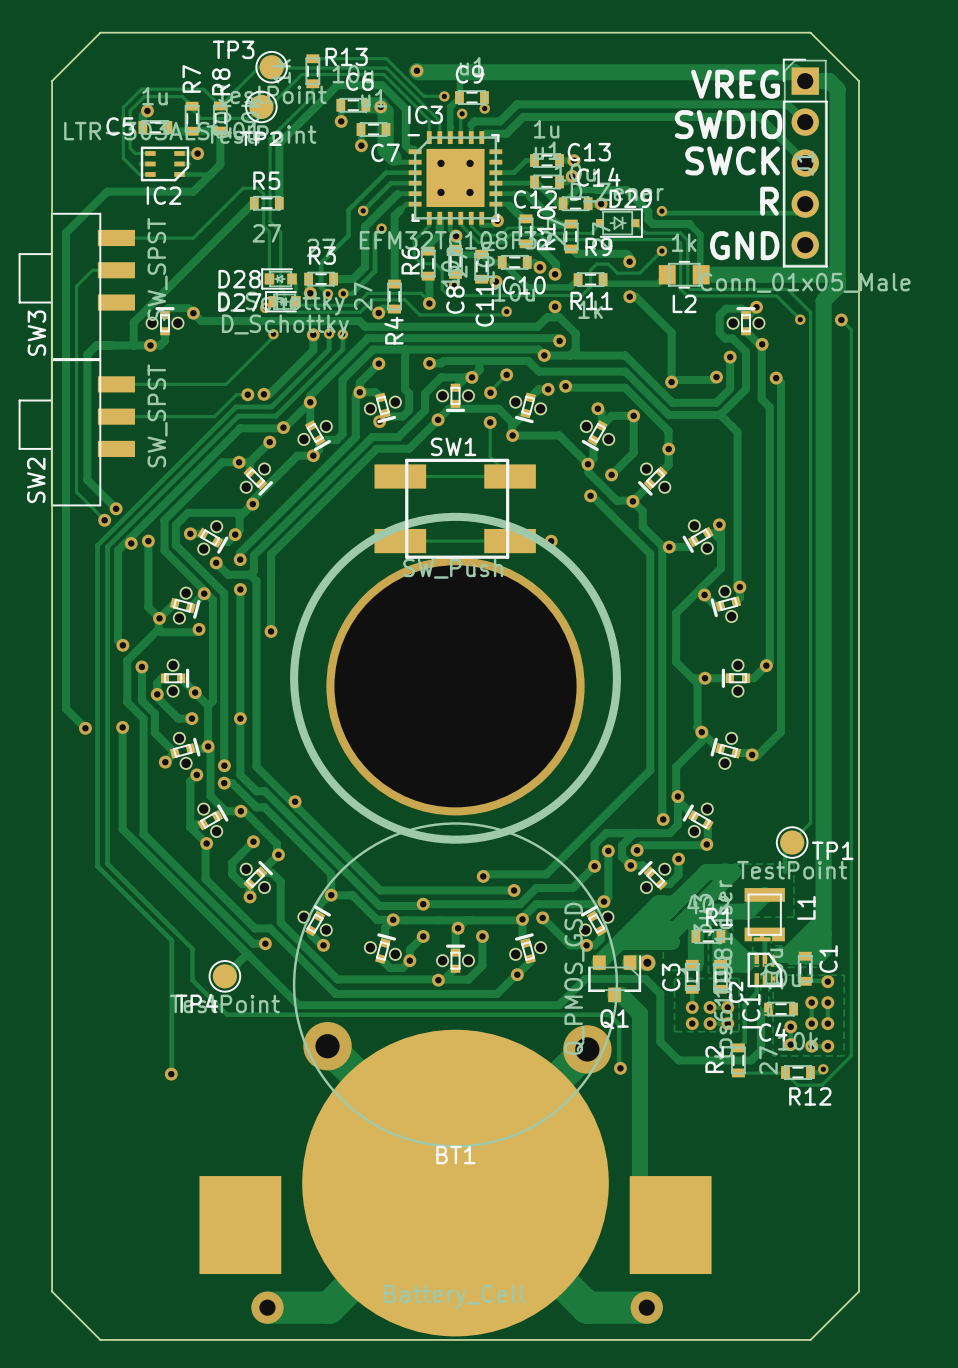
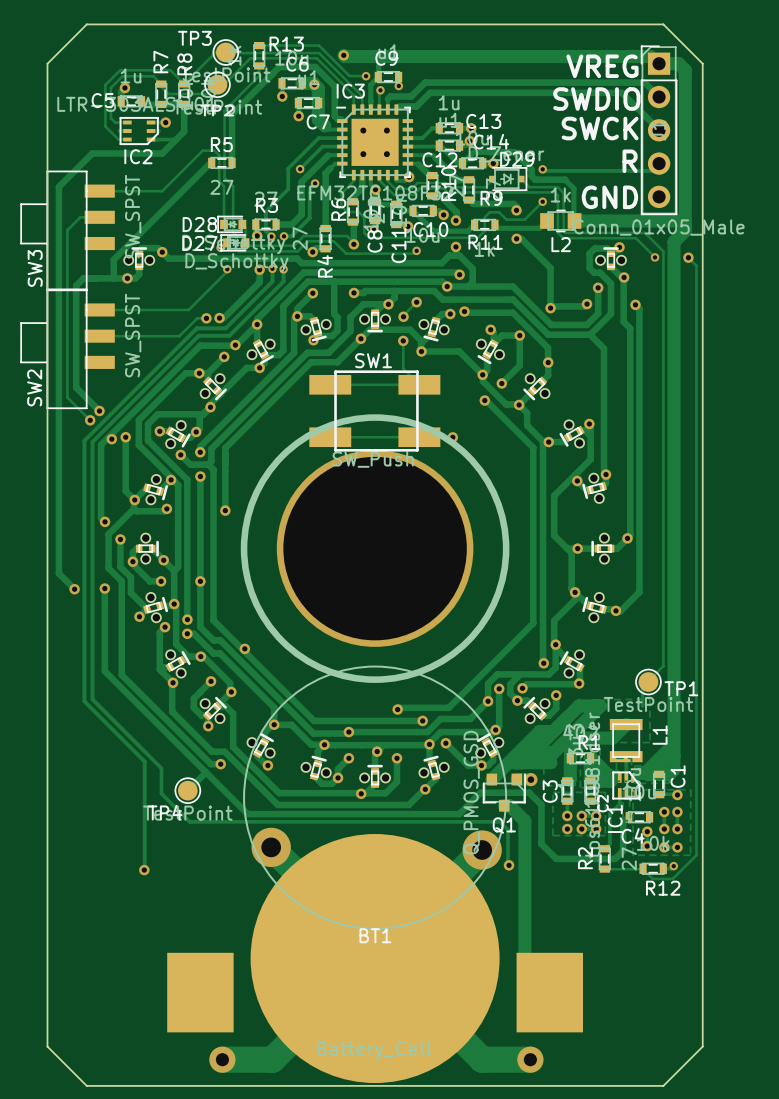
via size: [326, 557, 585, 816] -> [276, 450, 474, 647]

